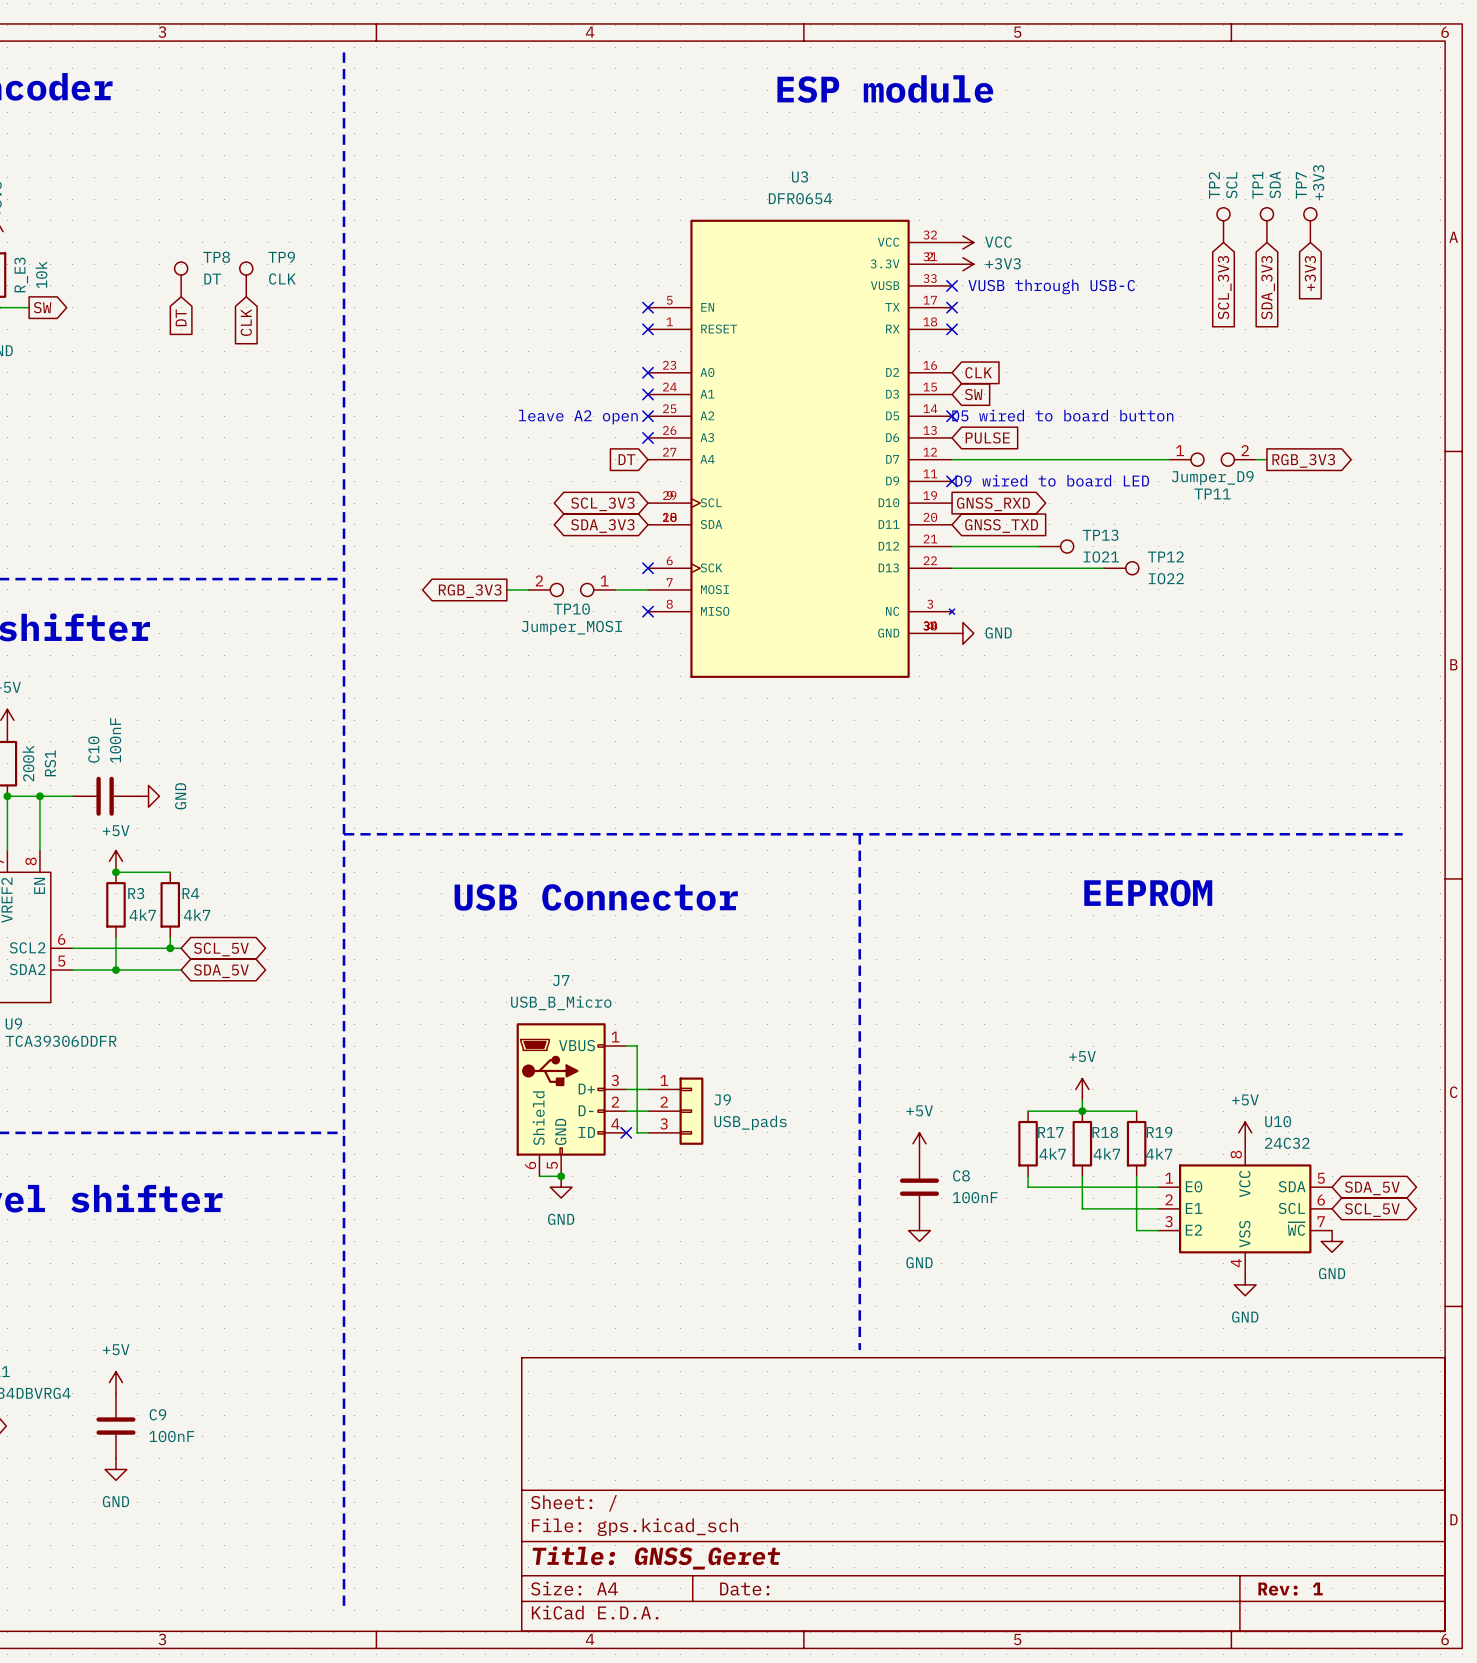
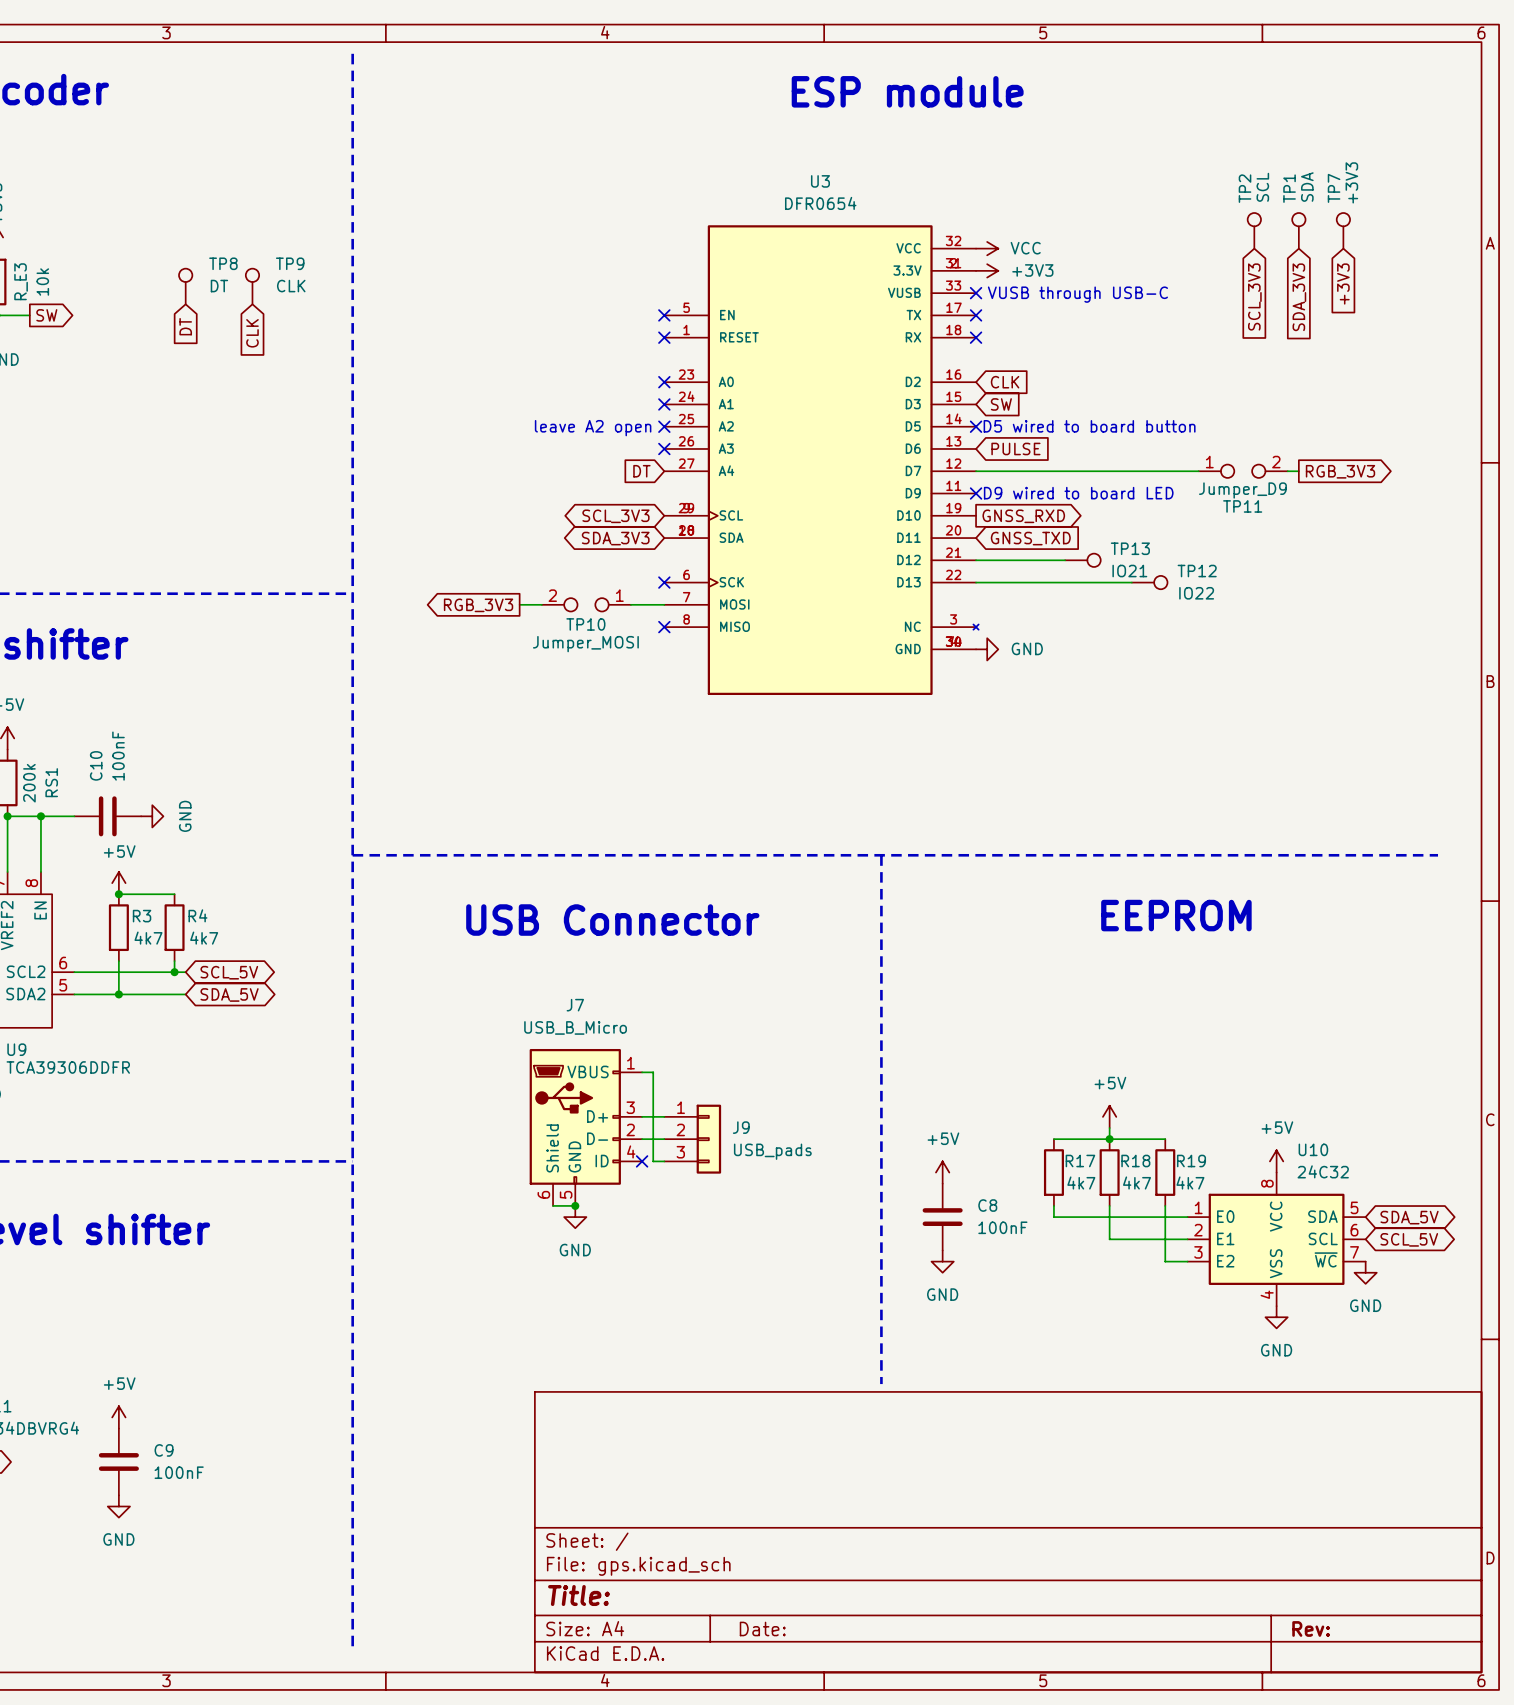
title block: Title: GNSS_Geret (656, 1558) -> Title: (578, 1595)
title block: Rev: 1 (1290, 1589) -> Rev: (1311, 1628)

